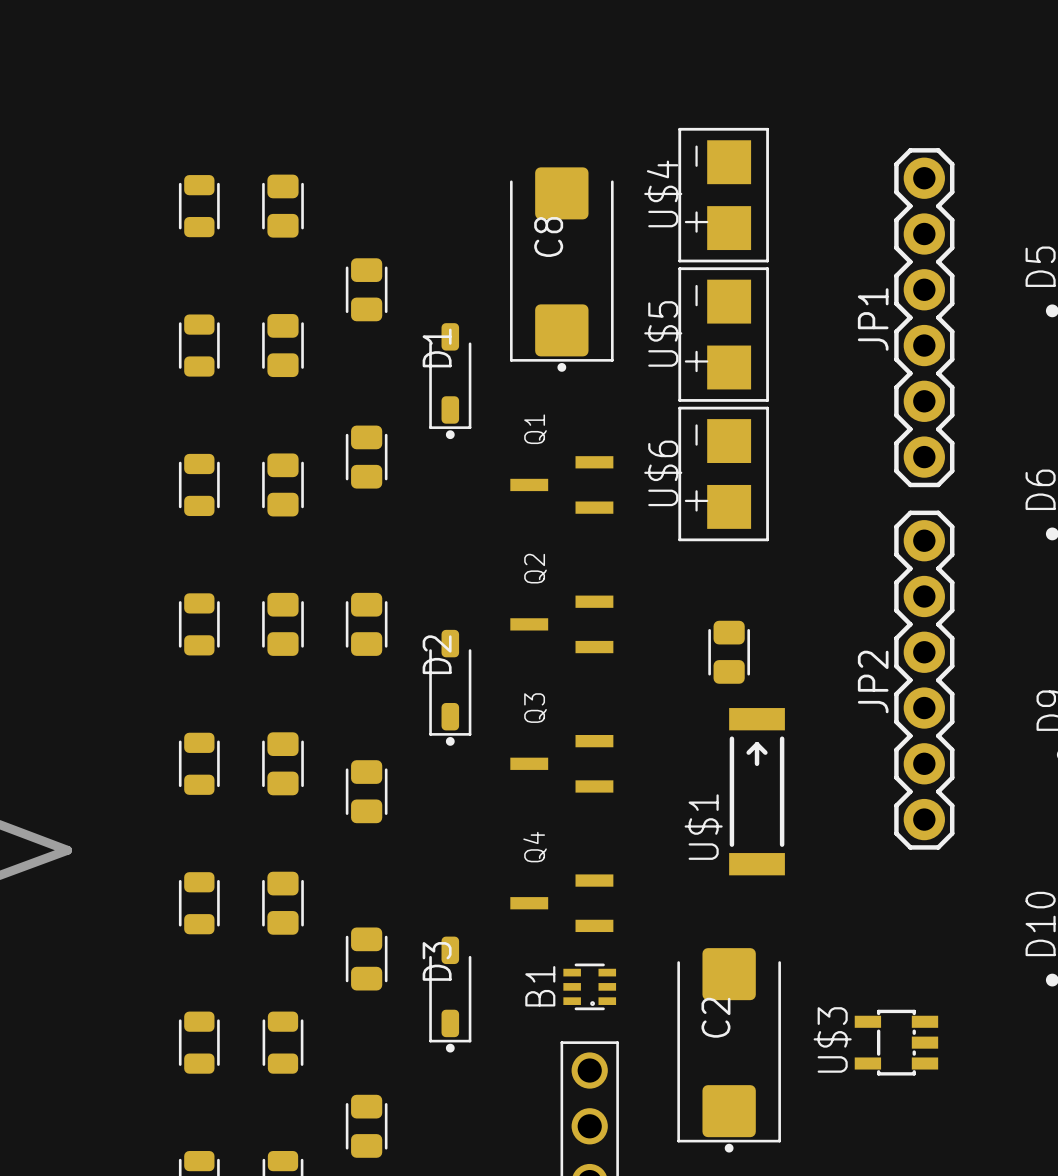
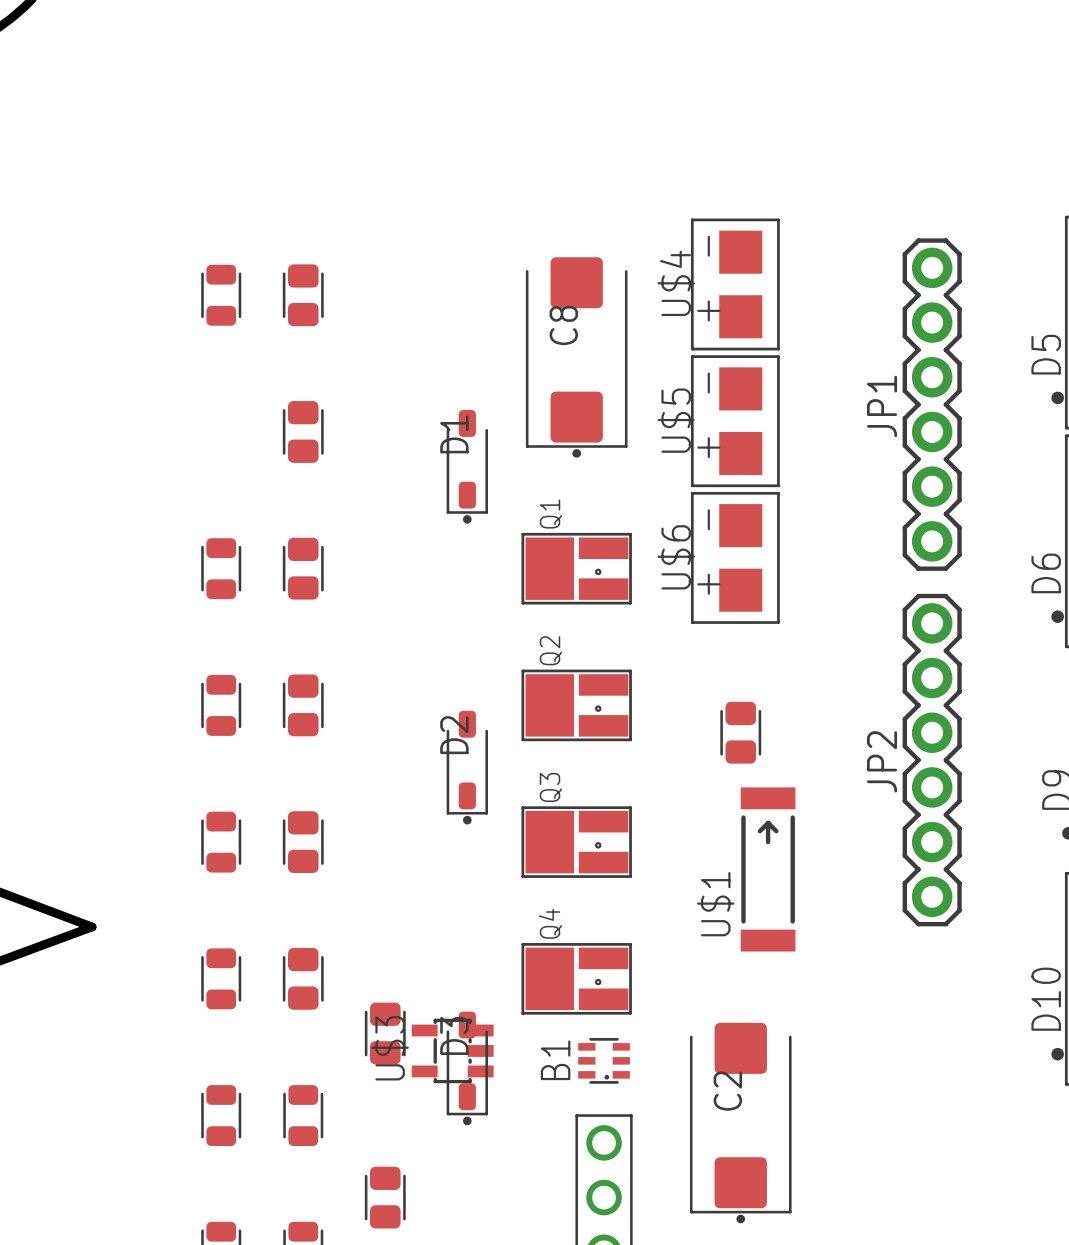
part: (366, 289) -> none
part: (199, 345) -> none
Q1 footprint: [510, 456, 614, 514] -> [521, 532, 632, 605]
part: (366, 457) -> none
Q2 footprint: [510, 595, 614, 654] -> [521, 669, 632, 742]
part: (366, 624) -> none
Q3 footprint: [510, 734, 614, 793] -> [521, 806, 632, 878]
part: (366, 791) -> none
Q4 footprint: [510, 874, 614, 933] -> [521, 943, 632, 1015]
U$3 position: (896, 1042) -> (452, 1050)

